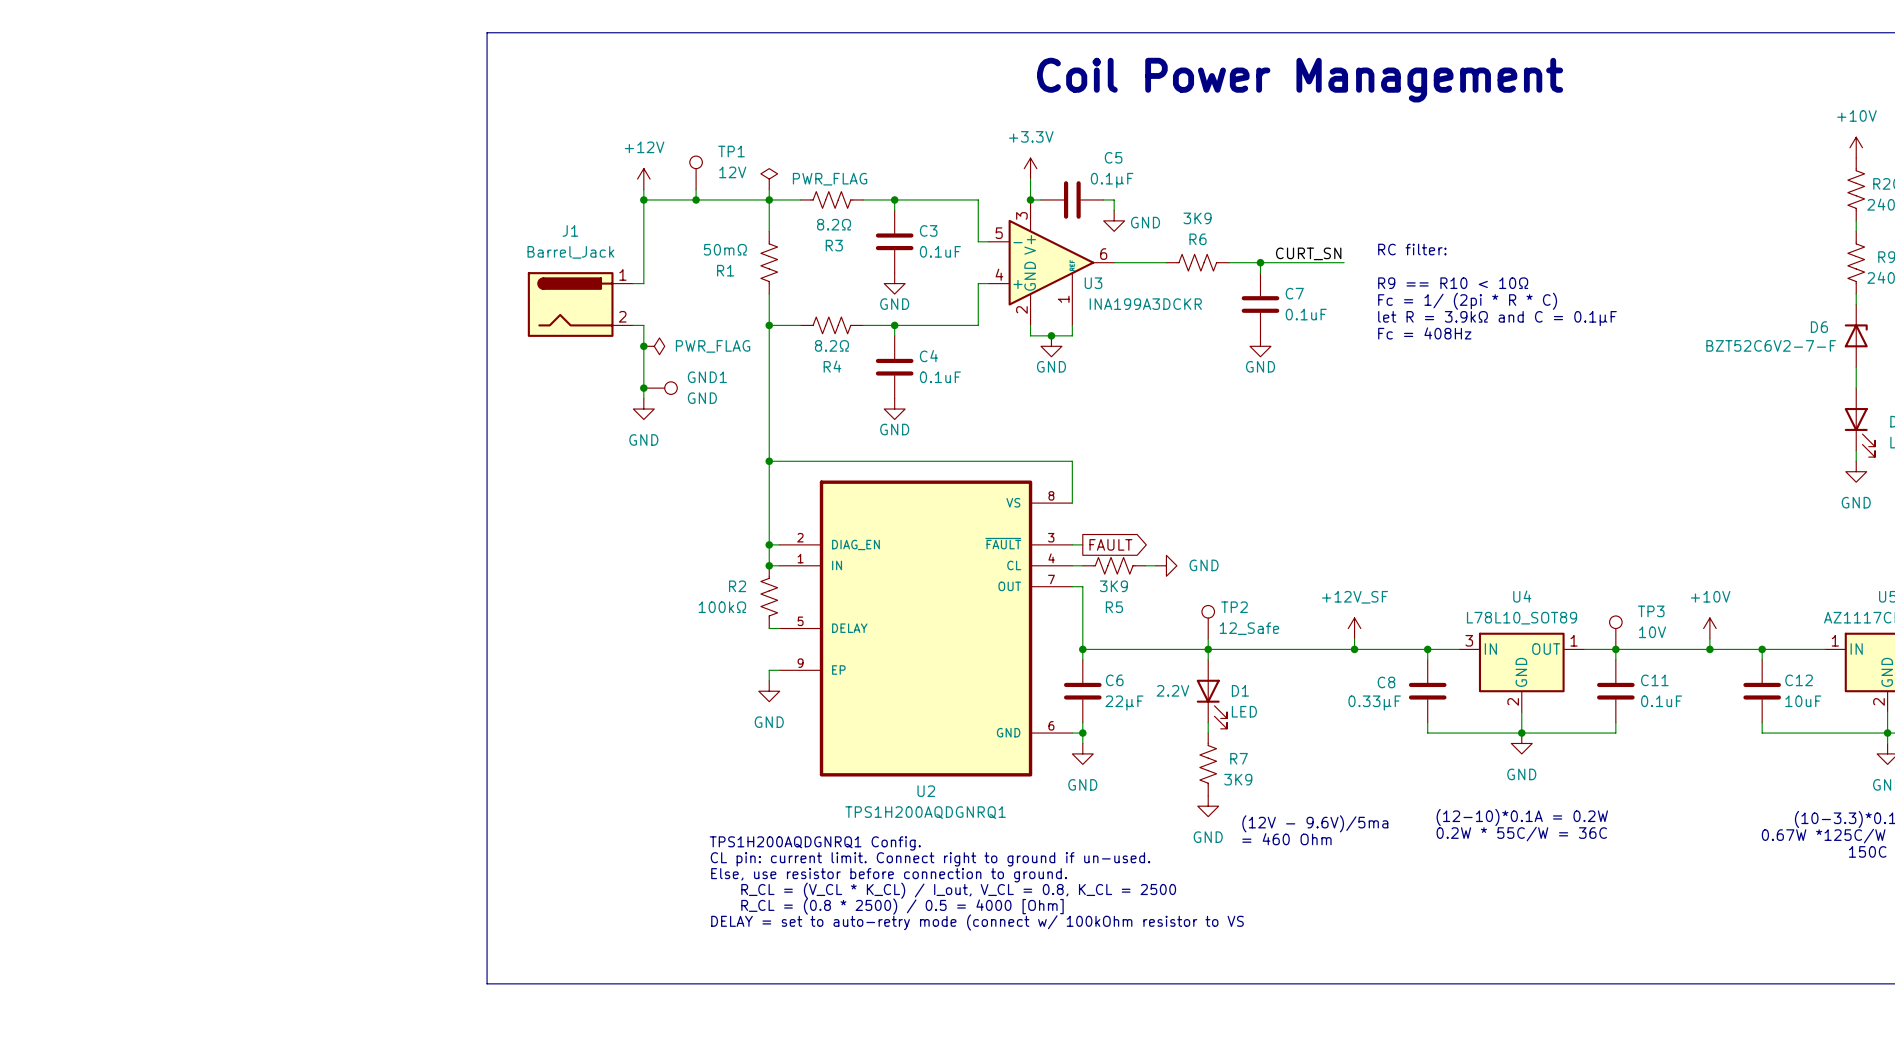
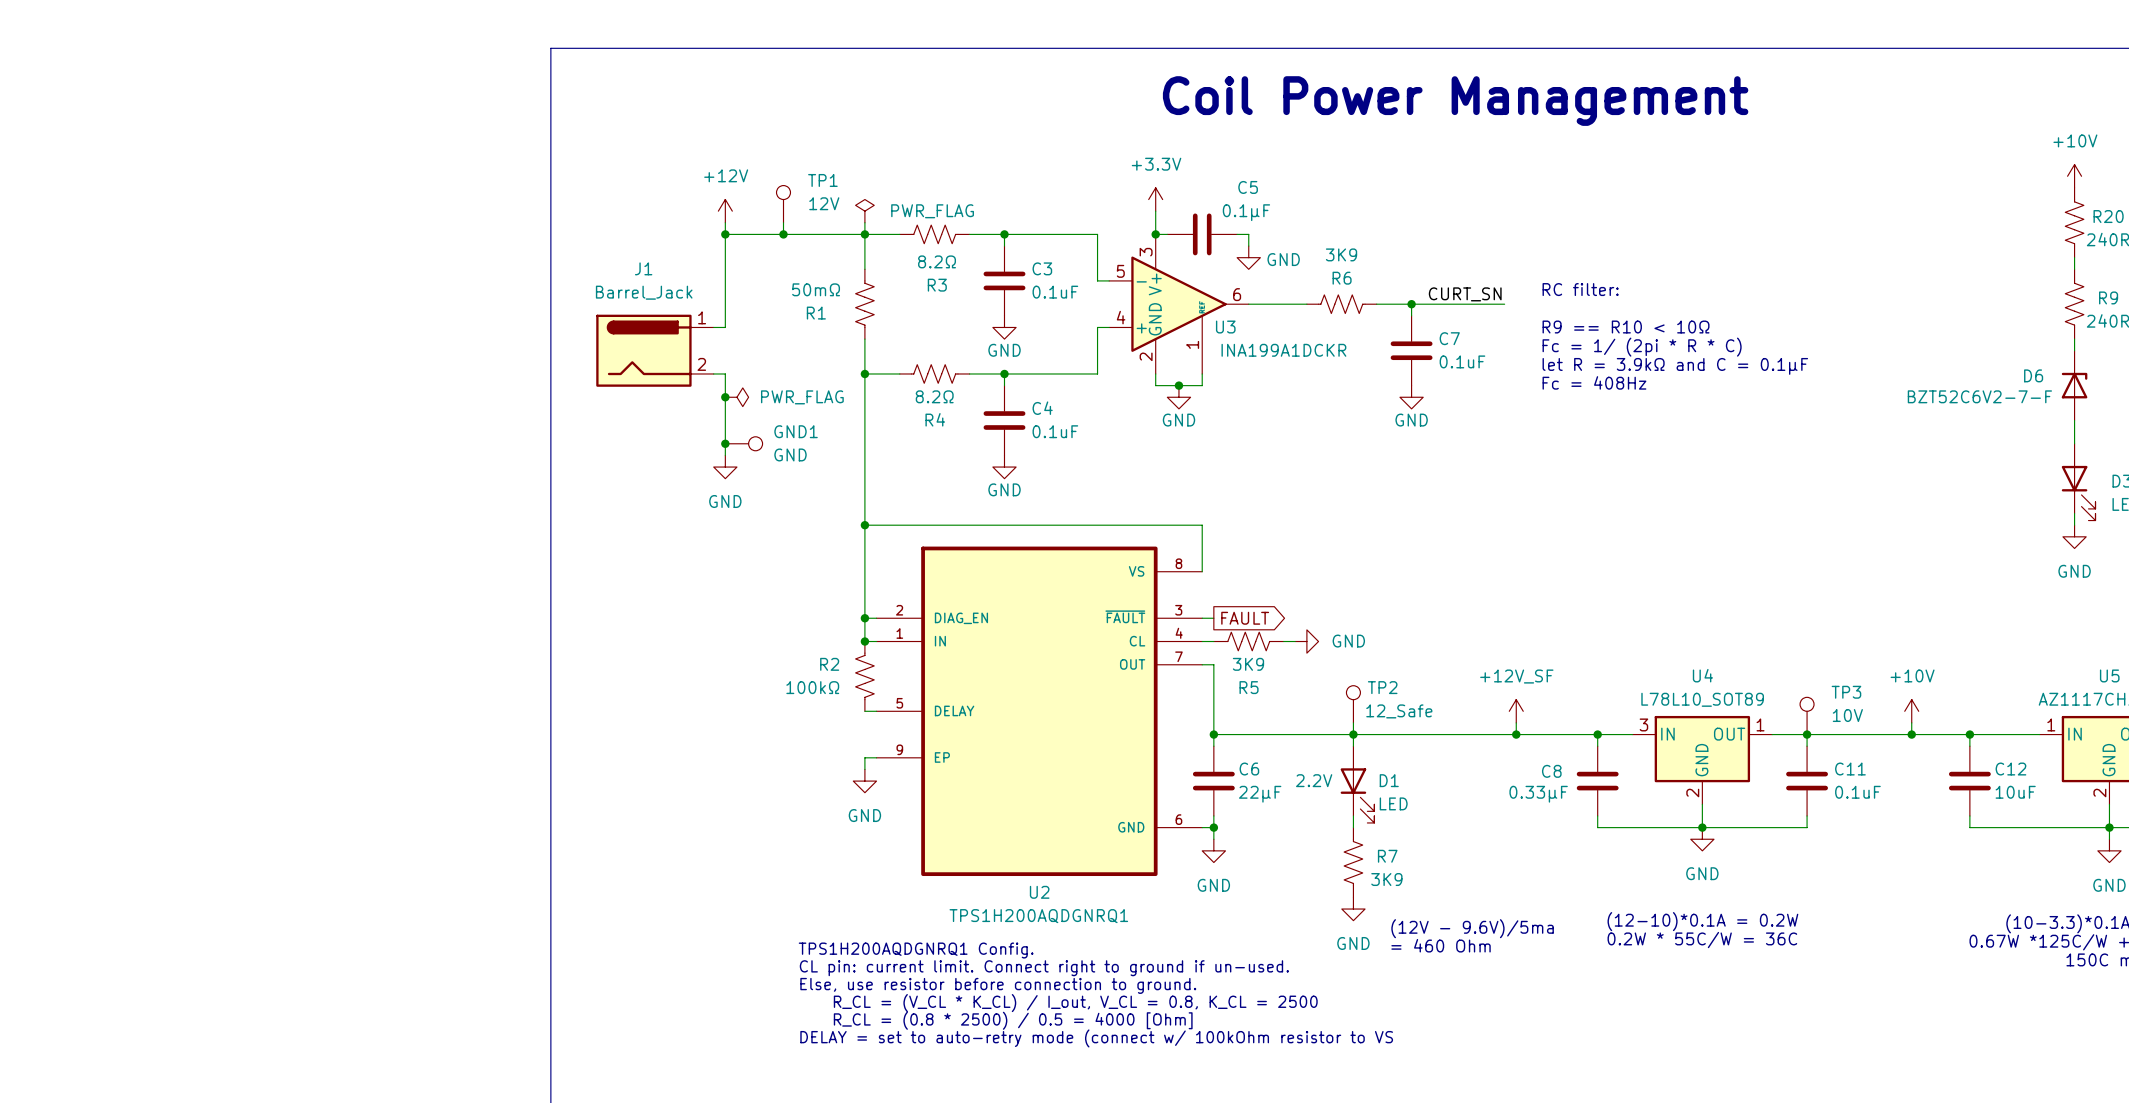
U3 value: INA199A3DCKR (1145, 304) -> INA199A1DCKR (1283, 350)

